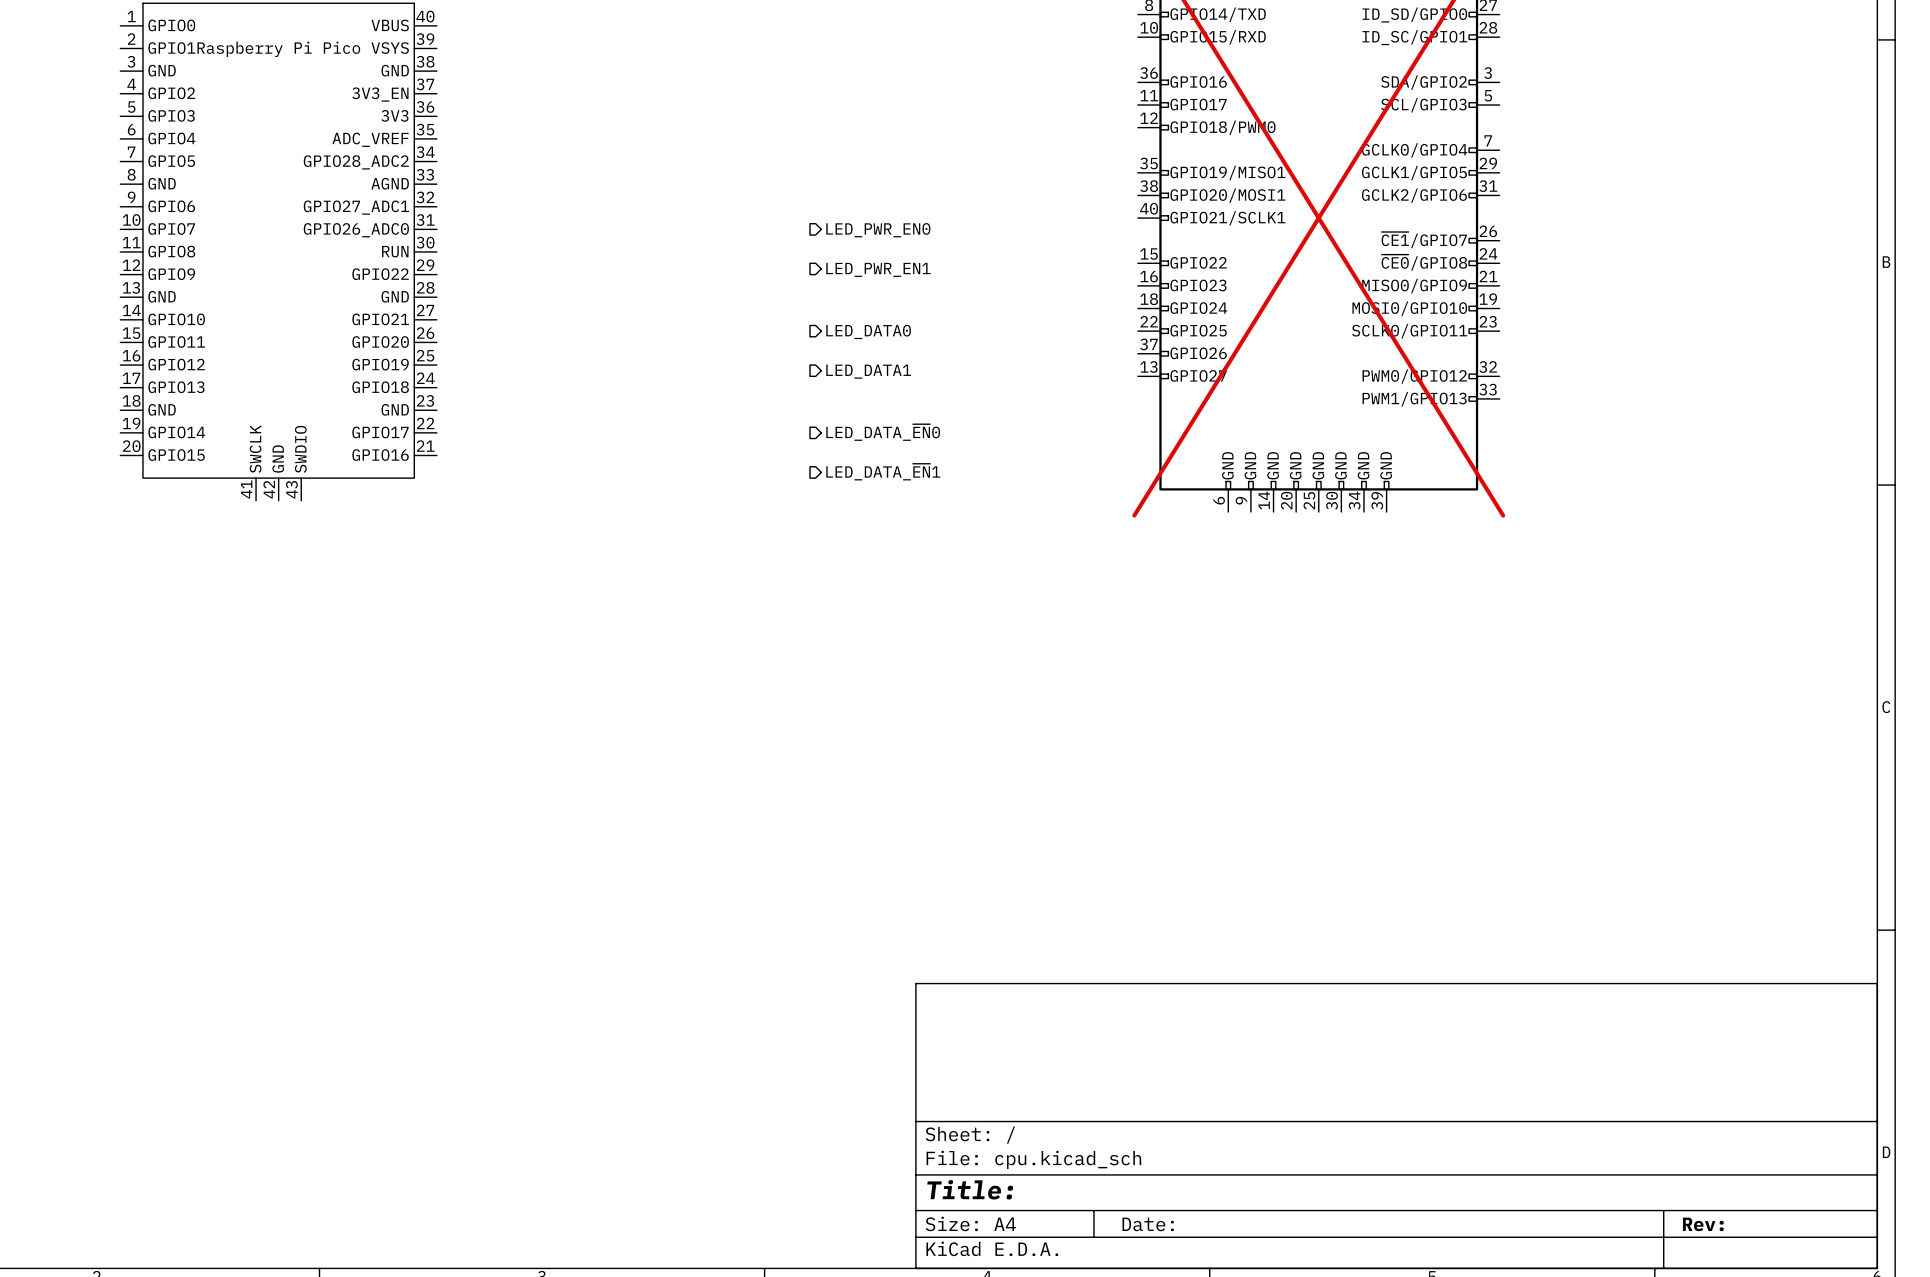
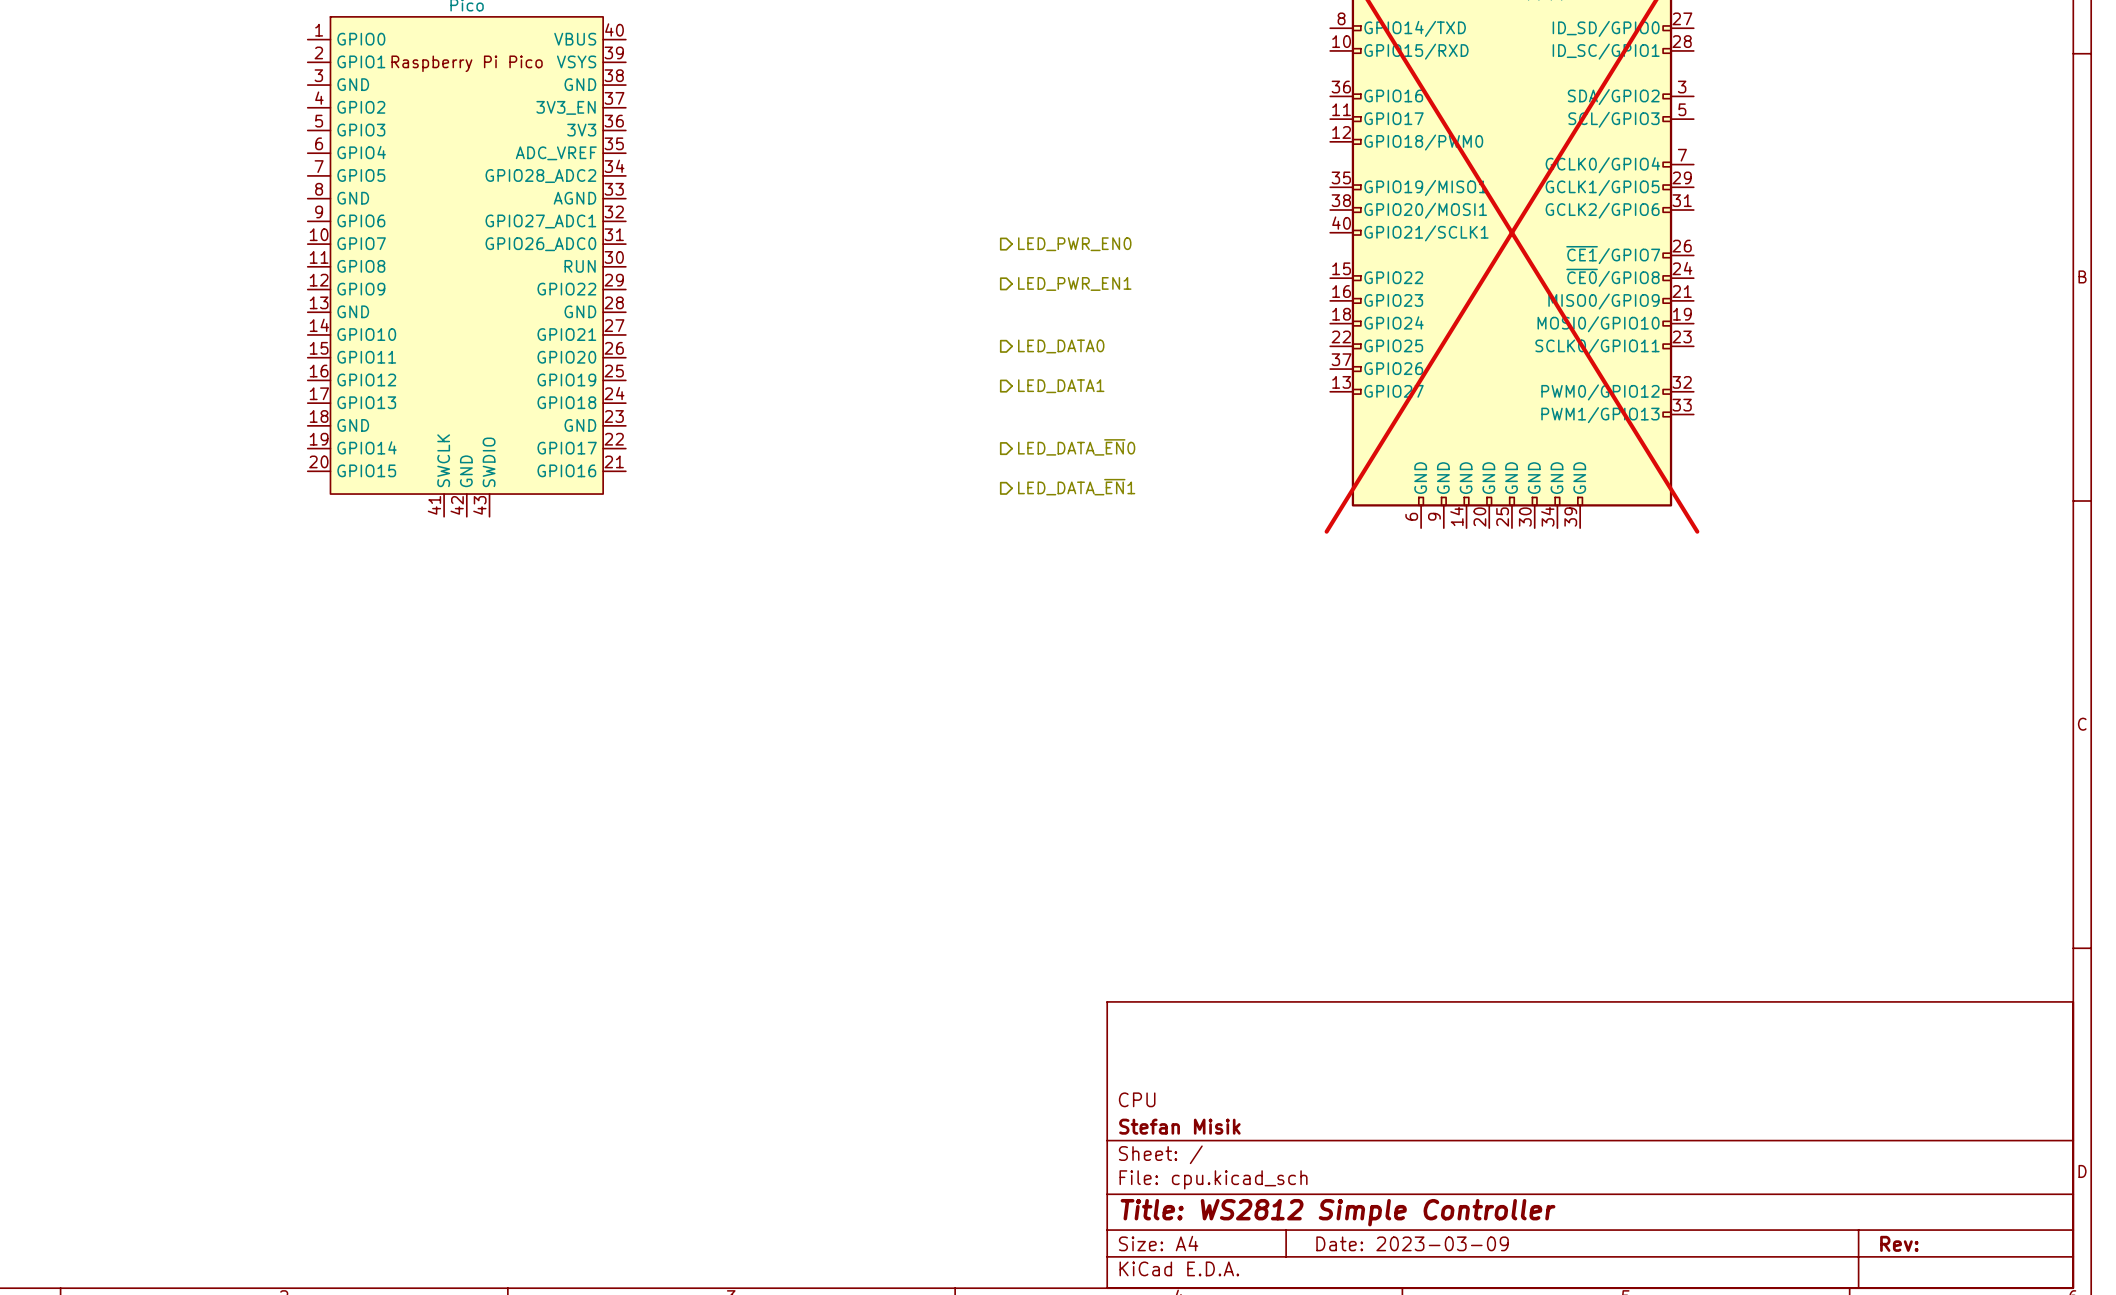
title block: none -> CPU (1137, 1099)
title block: none -> Stefan Misik (1179, 1126)
title block: Title: (970, 1189) -> Title: WS2812 Simple Controller (1338, 1212)
title block: Date: (1148, 1224) -> Date: 2023-03-09 (1412, 1243)

